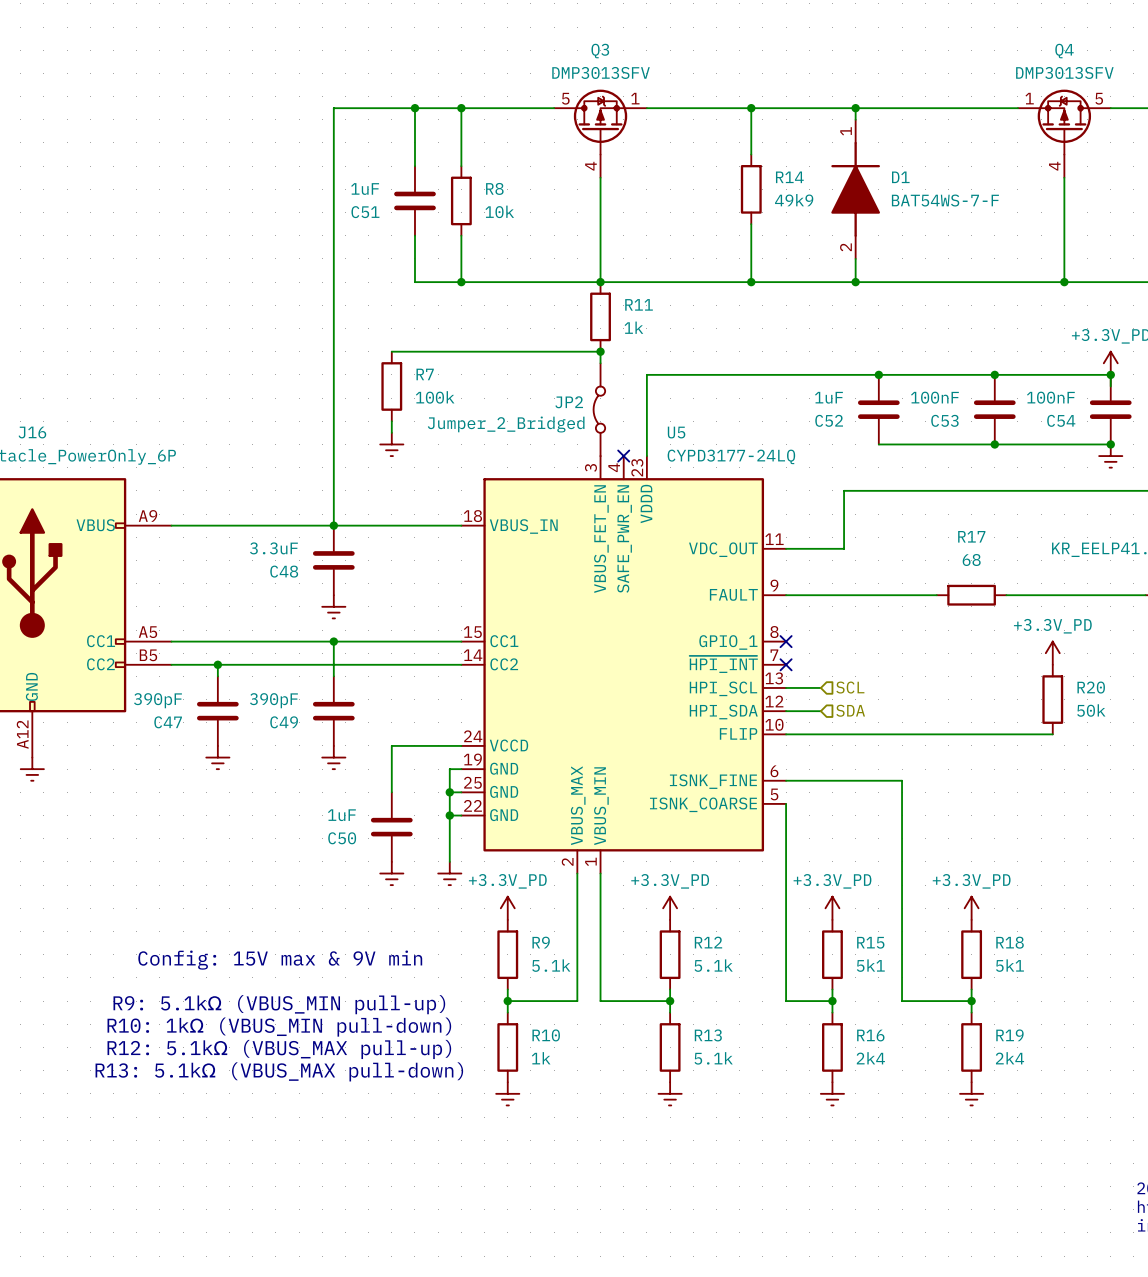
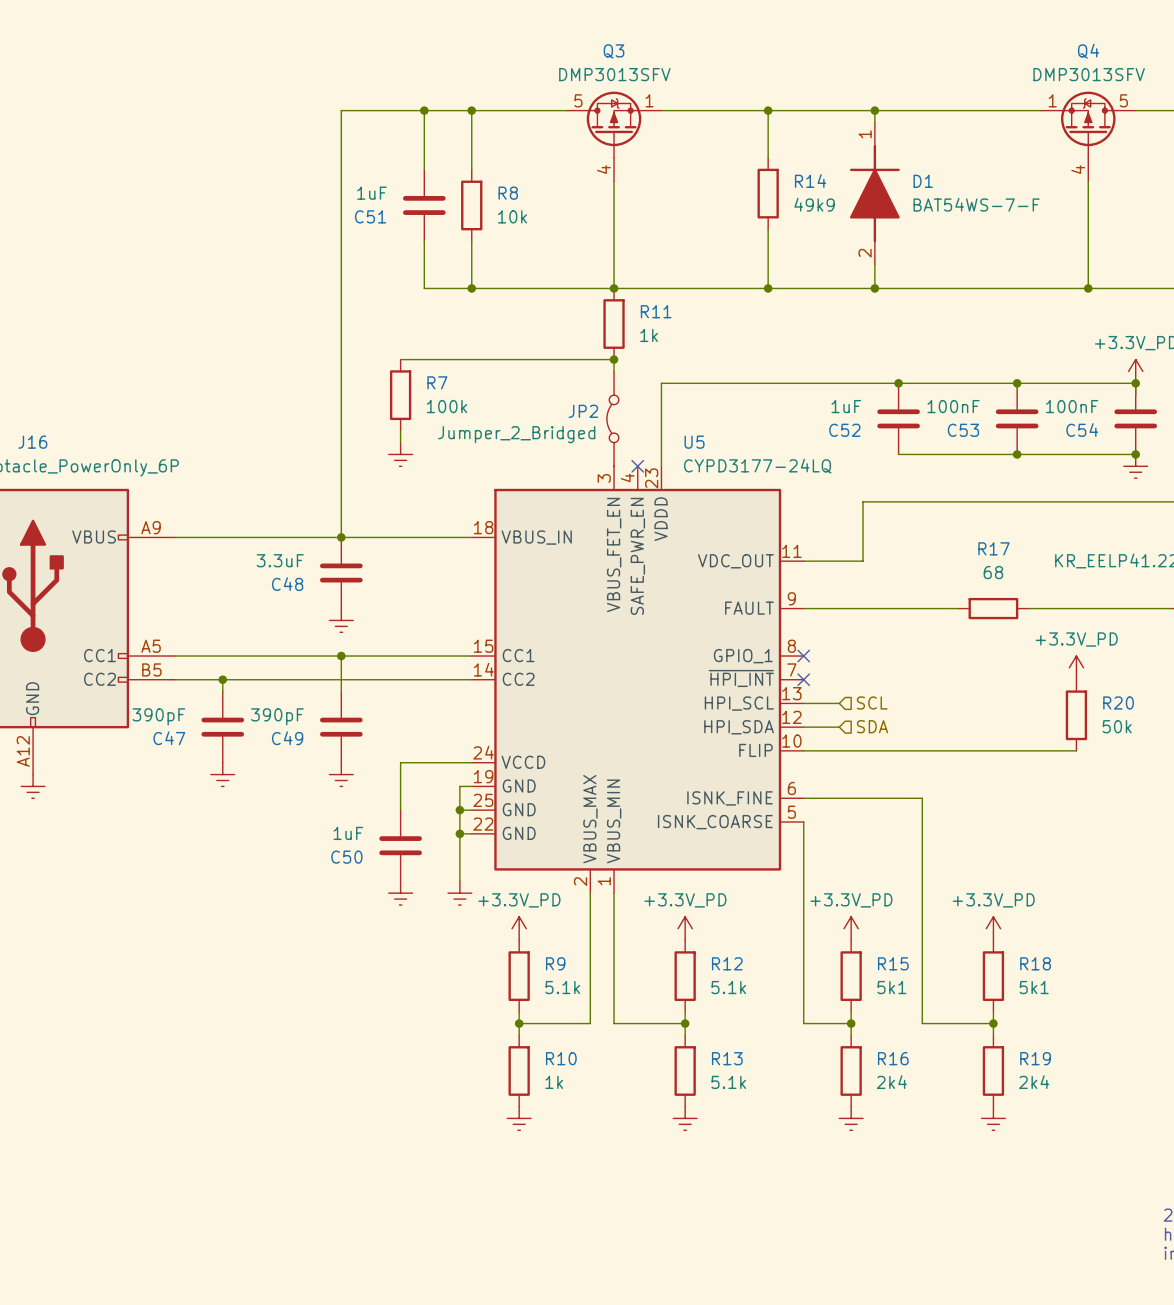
text: Config: 15V max & 9V min (280, 960) -> none
text: R9: 5.1kΩ (VBUS_MIN pull-up) (279, 1004) -> none
text: R10: 1kΩ (VBUS_MIN pull-down) (279, 1027) -> none
text: R12: 5.1kΩ (VBUS_MAX pull-up) (279, 1049) -> none
text: R13: 5.1kΩ (VBUS_MAX pull-down) (279, 1071) -> none

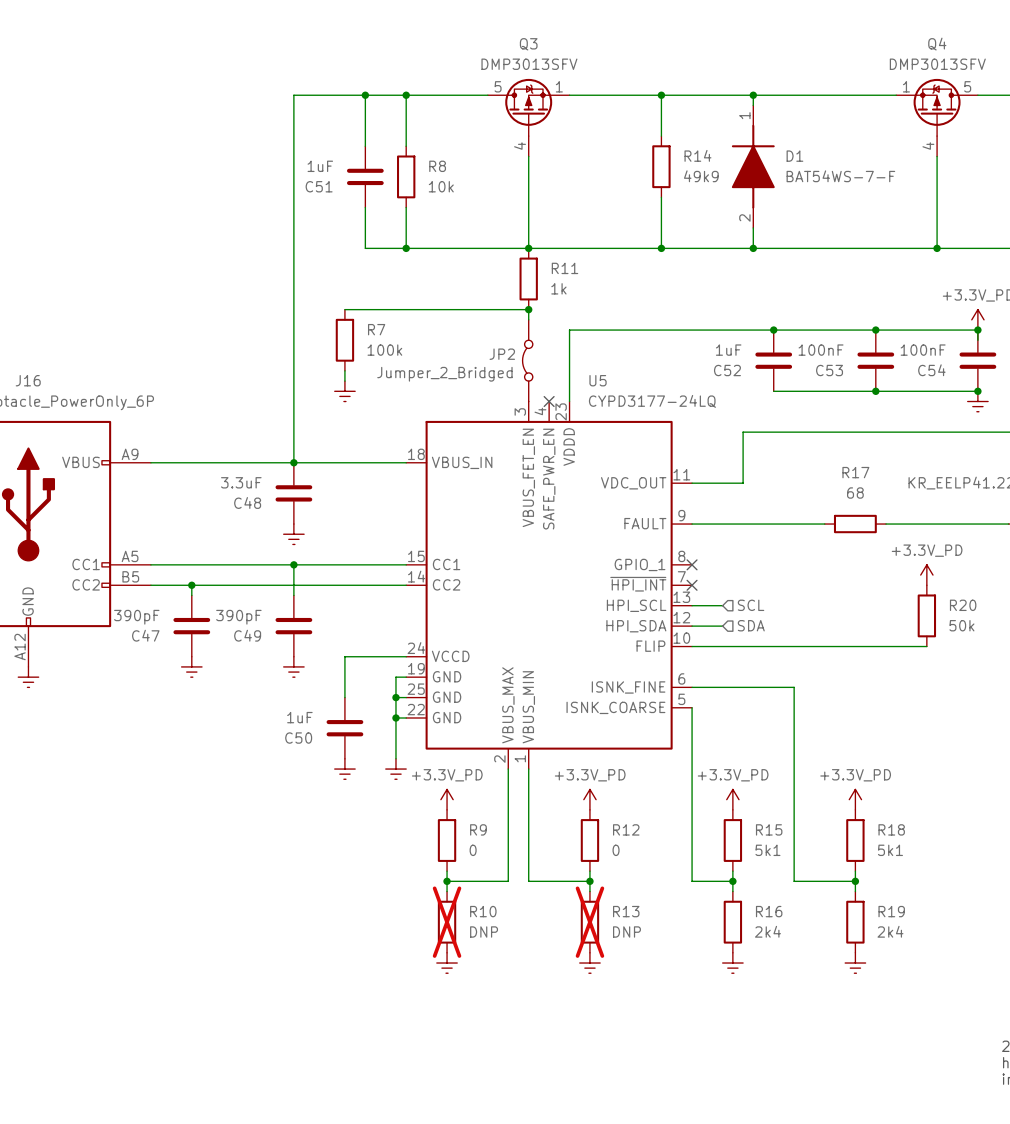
R9 value: 5.1k (562, 987) -> 0 (473, 850)
R12 value: 5.1k (728, 987) -> 0 (616, 850)
R10 do-not-place cross: none -> (447, 922)
R13 do-not-place cross: none -> (589, 922)
R10 value: 1k (554, 1082) -> DNP (484, 932)
R13 value: 5.1k (728, 1082) -> DNP (626, 932)

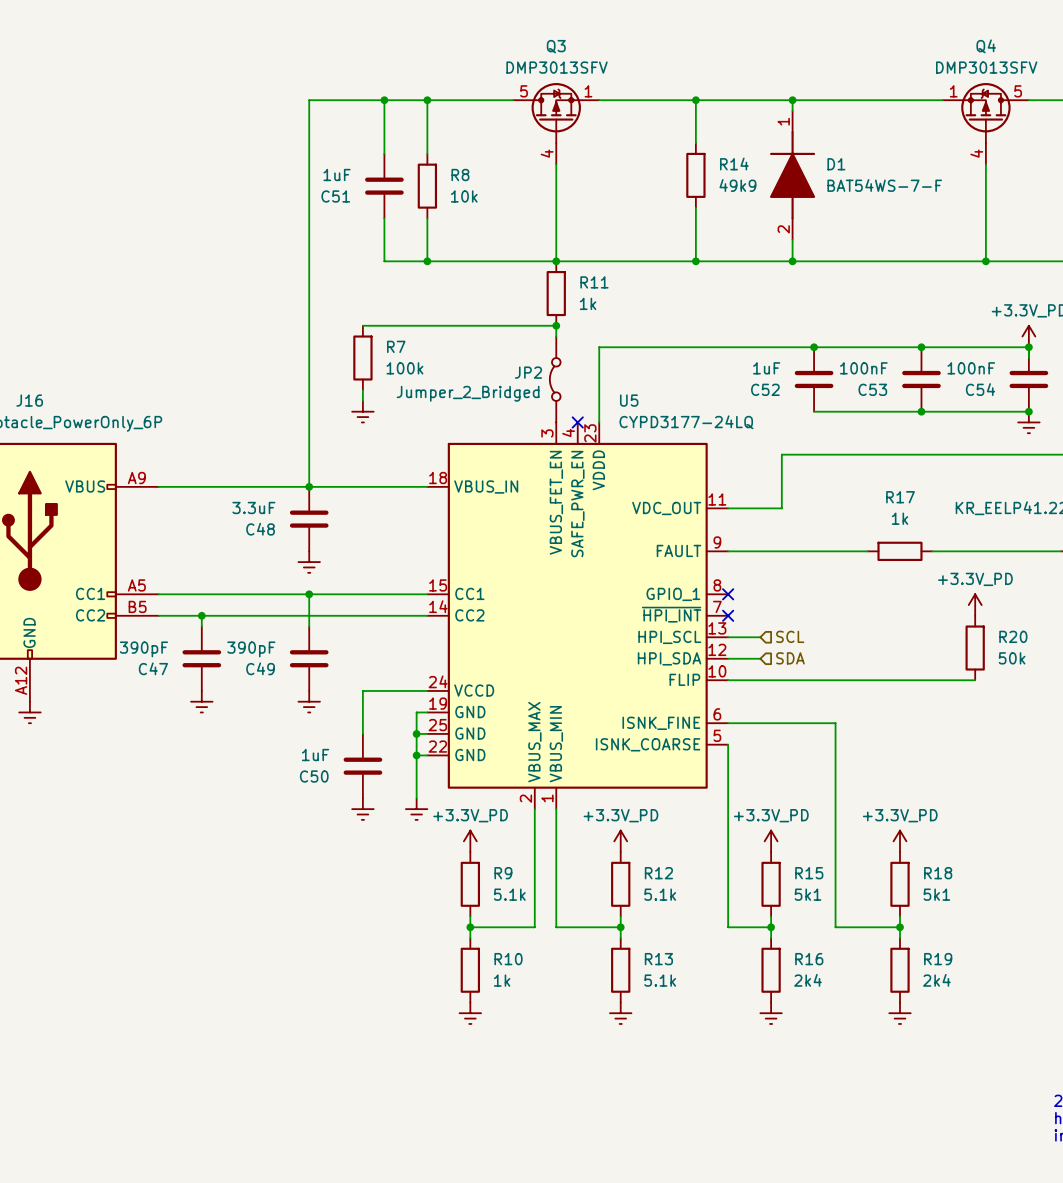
R17 value: 68 (855, 493) -> 1k (899, 518)
R9 value: 0 (473, 850) -> 5.1k (509, 894)
R12 value: 0 (616, 850) -> 5.1k (660, 894)
R10 do-not-place cross: (447, 922) -> none
R13 do-not-place cross: (589, 922) -> none
R10 value: DNP (484, 932) -> 1k (502, 980)
R13 value: DNP (626, 932) -> 5.1k (660, 980)

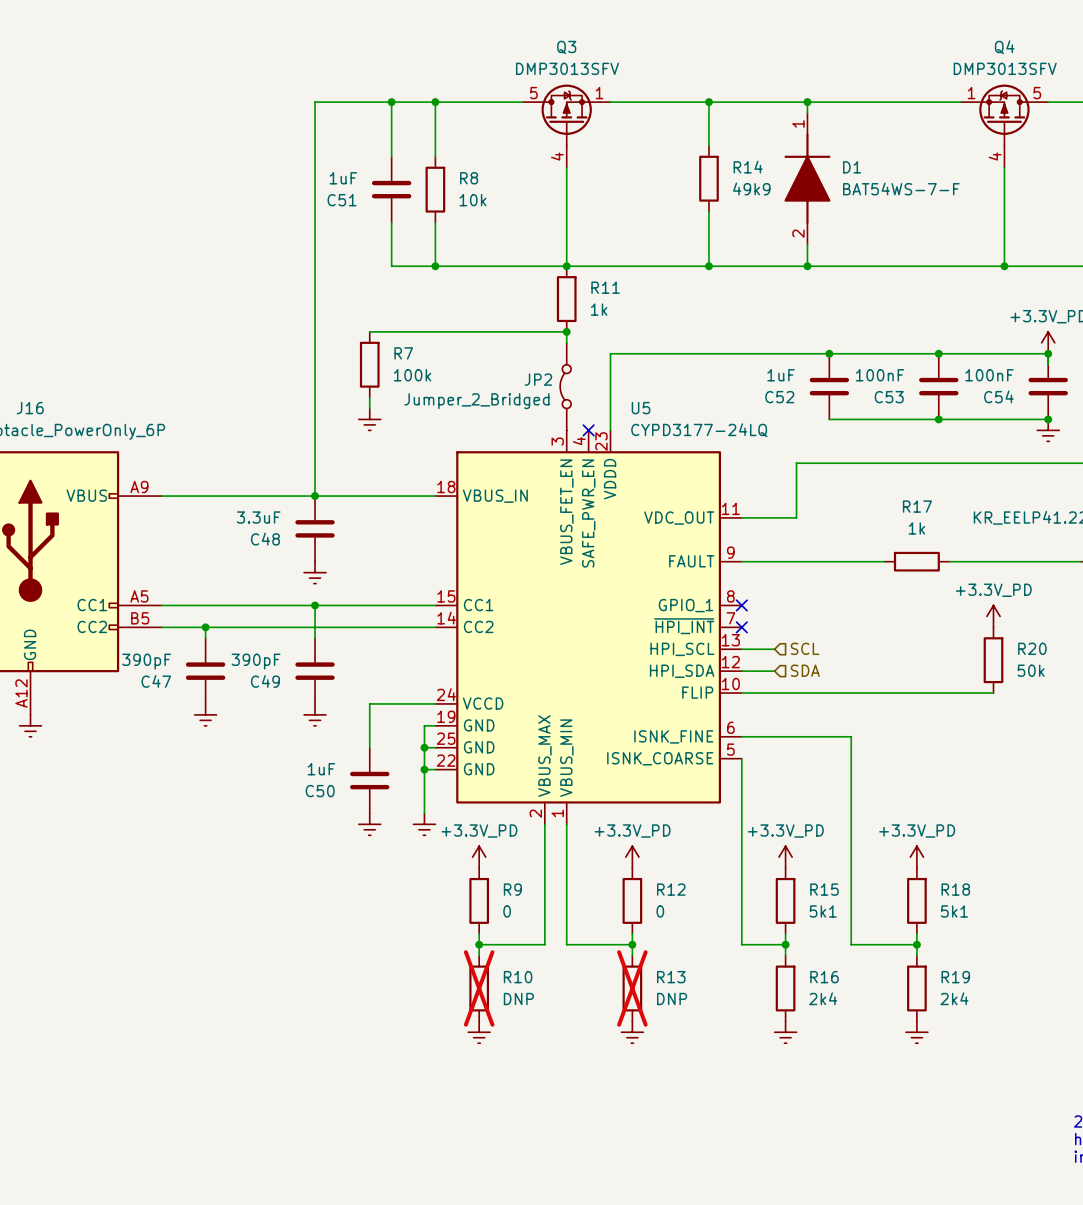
R9 value: 5.1k (509, 894) -> 0 (507, 911)
R12 value: 5.1k (660, 894) -> 0 (660, 911)
R10 do-not-place cross: none -> (479, 988)
R13 do-not-place cross: none -> (632, 988)
R10 value: 1k (502, 980) -> DNP (518, 999)
R13 value: 5.1k (660, 980) -> DNP (672, 999)

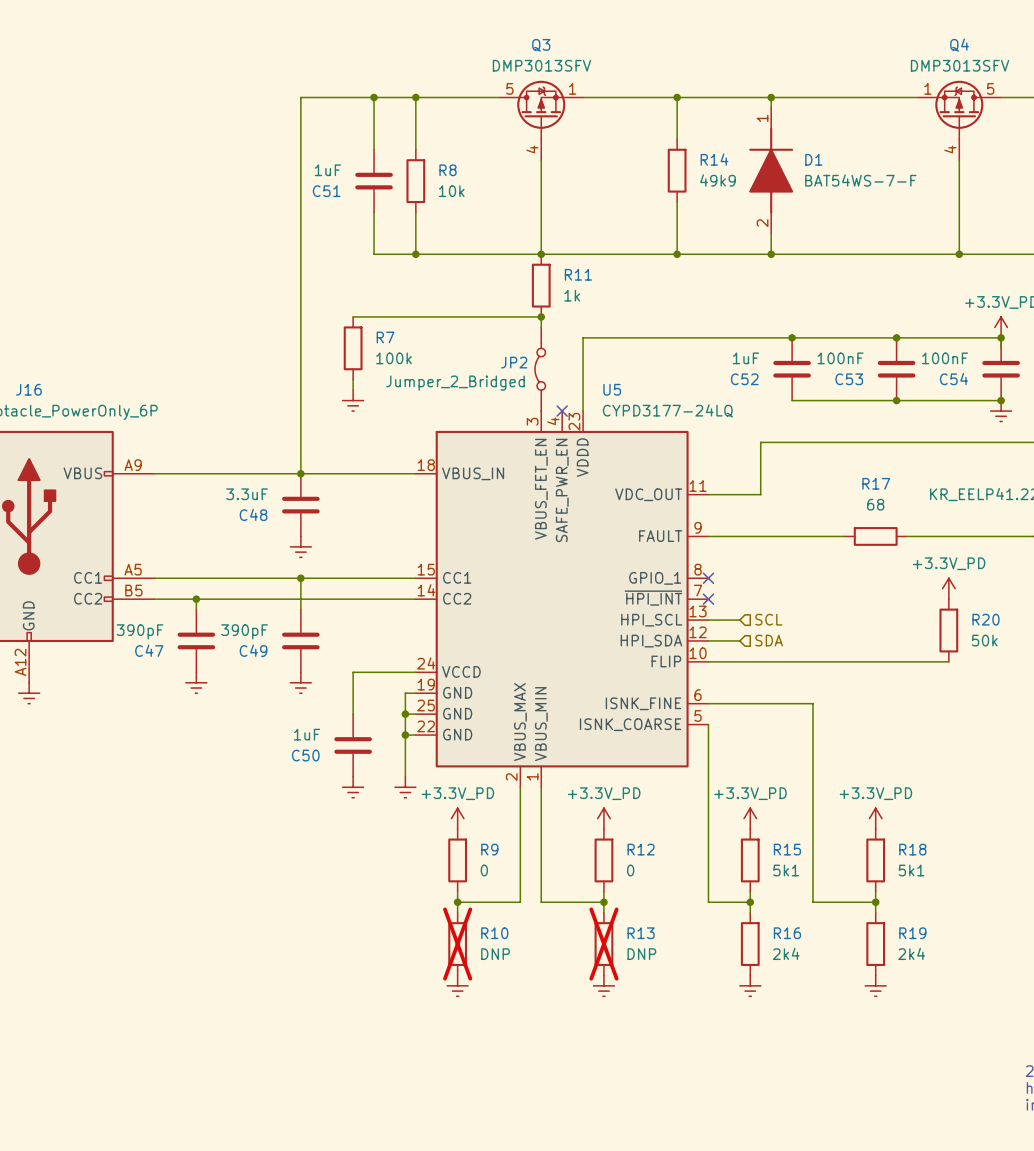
R17 value: 1k (916, 528) -> 68 (875, 504)

